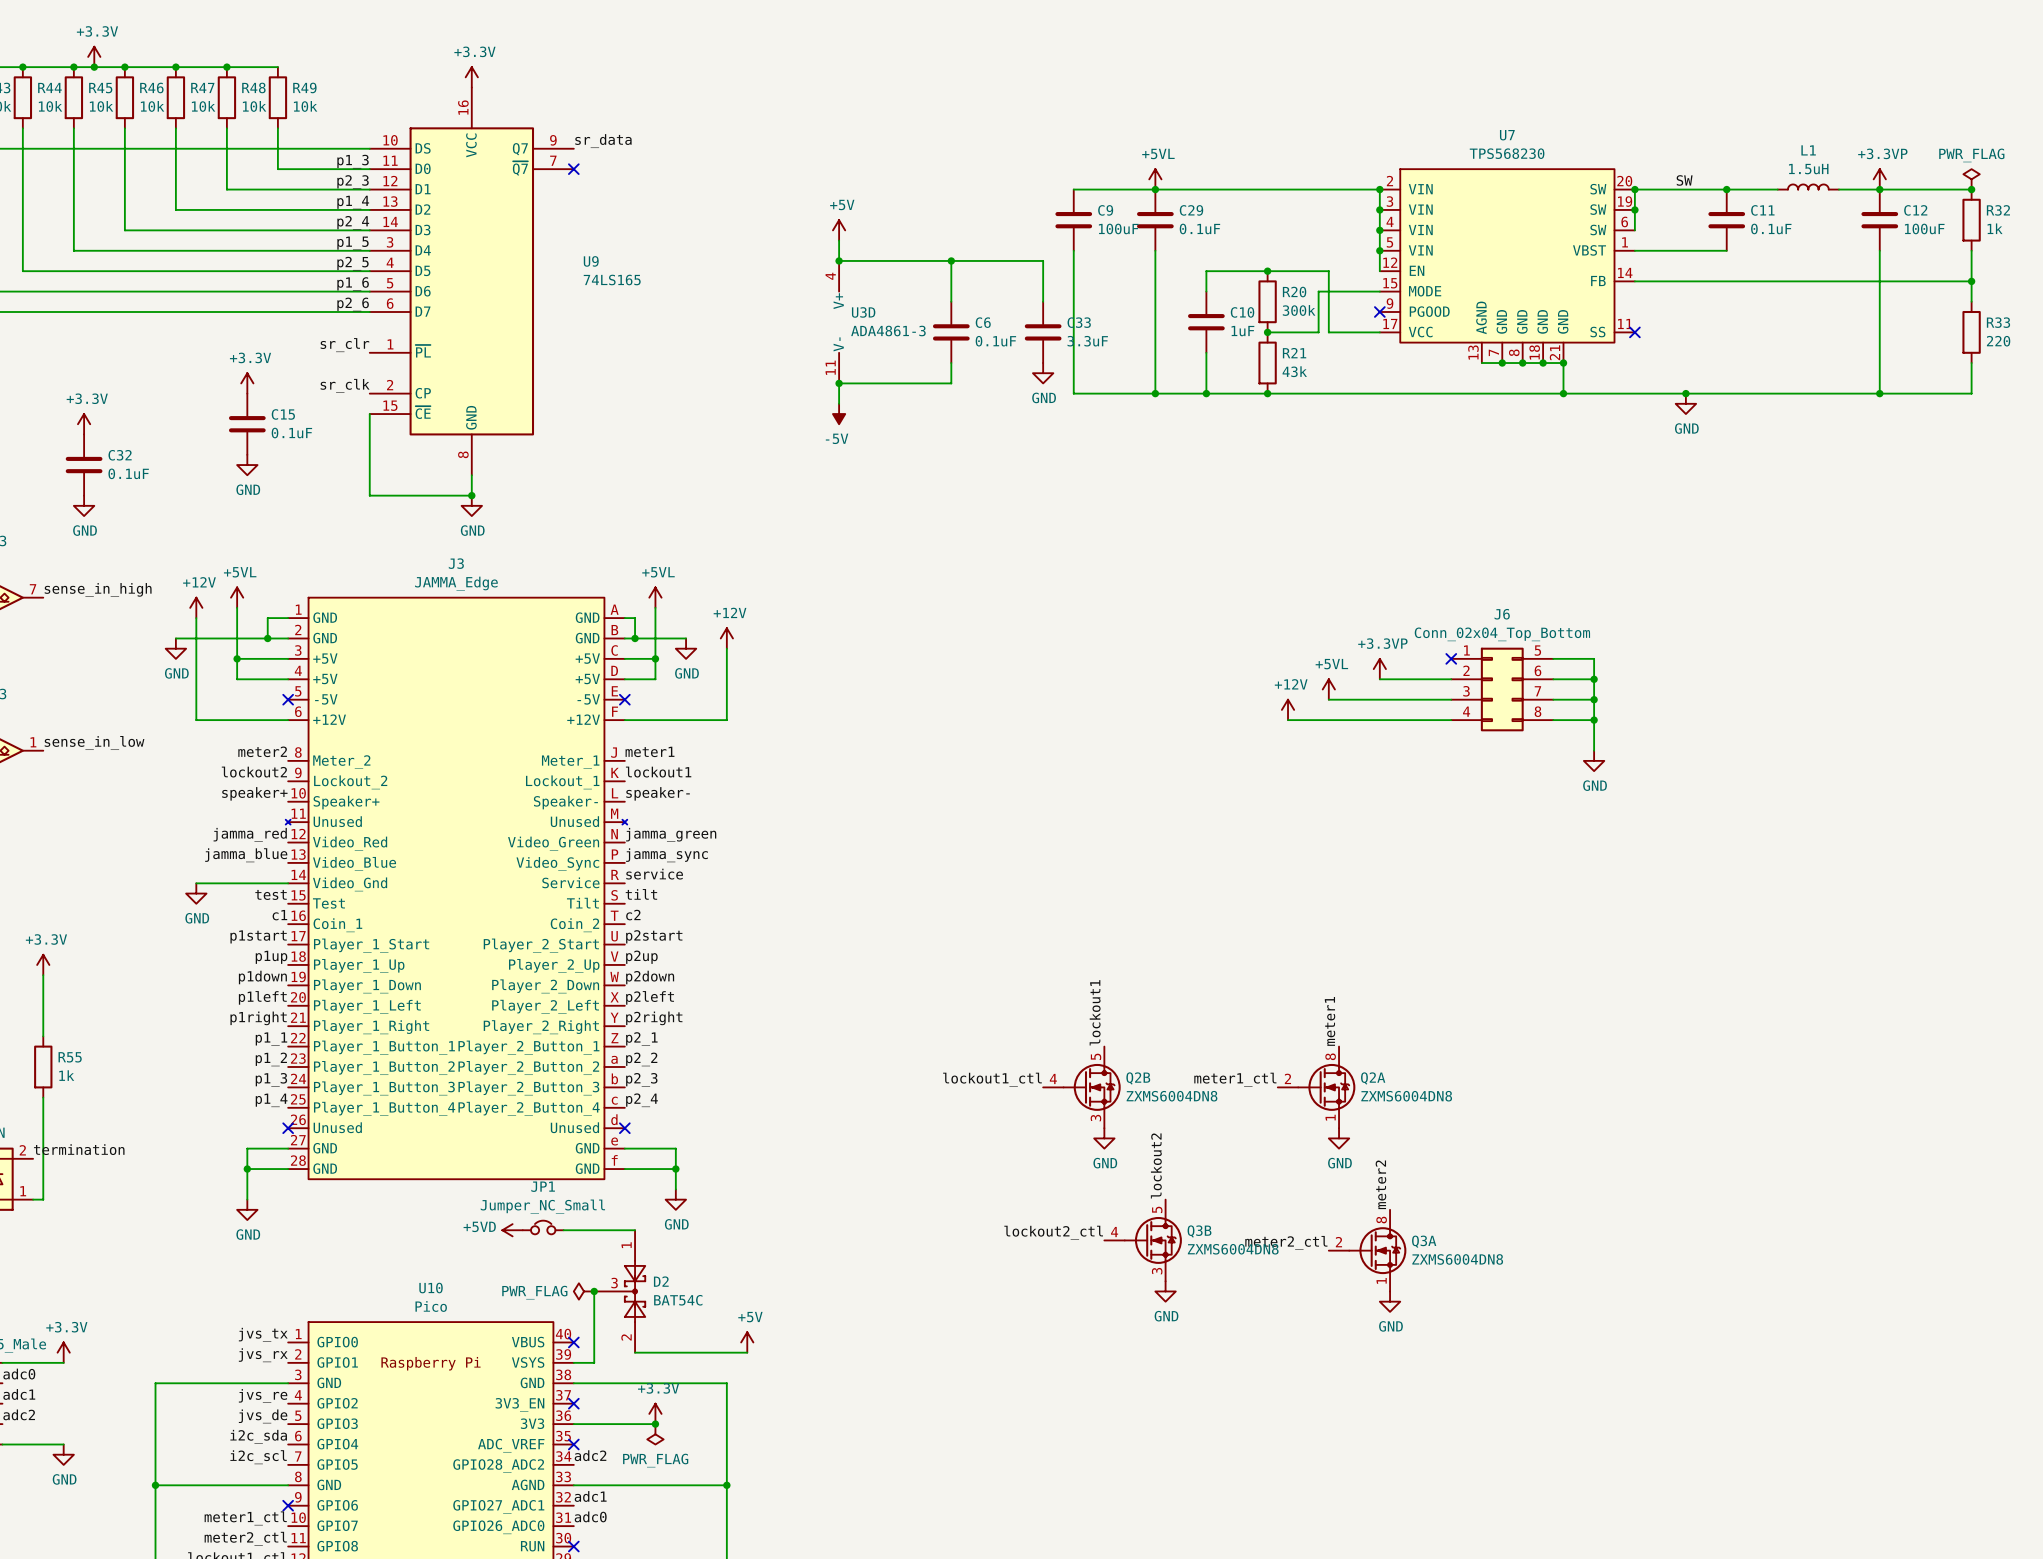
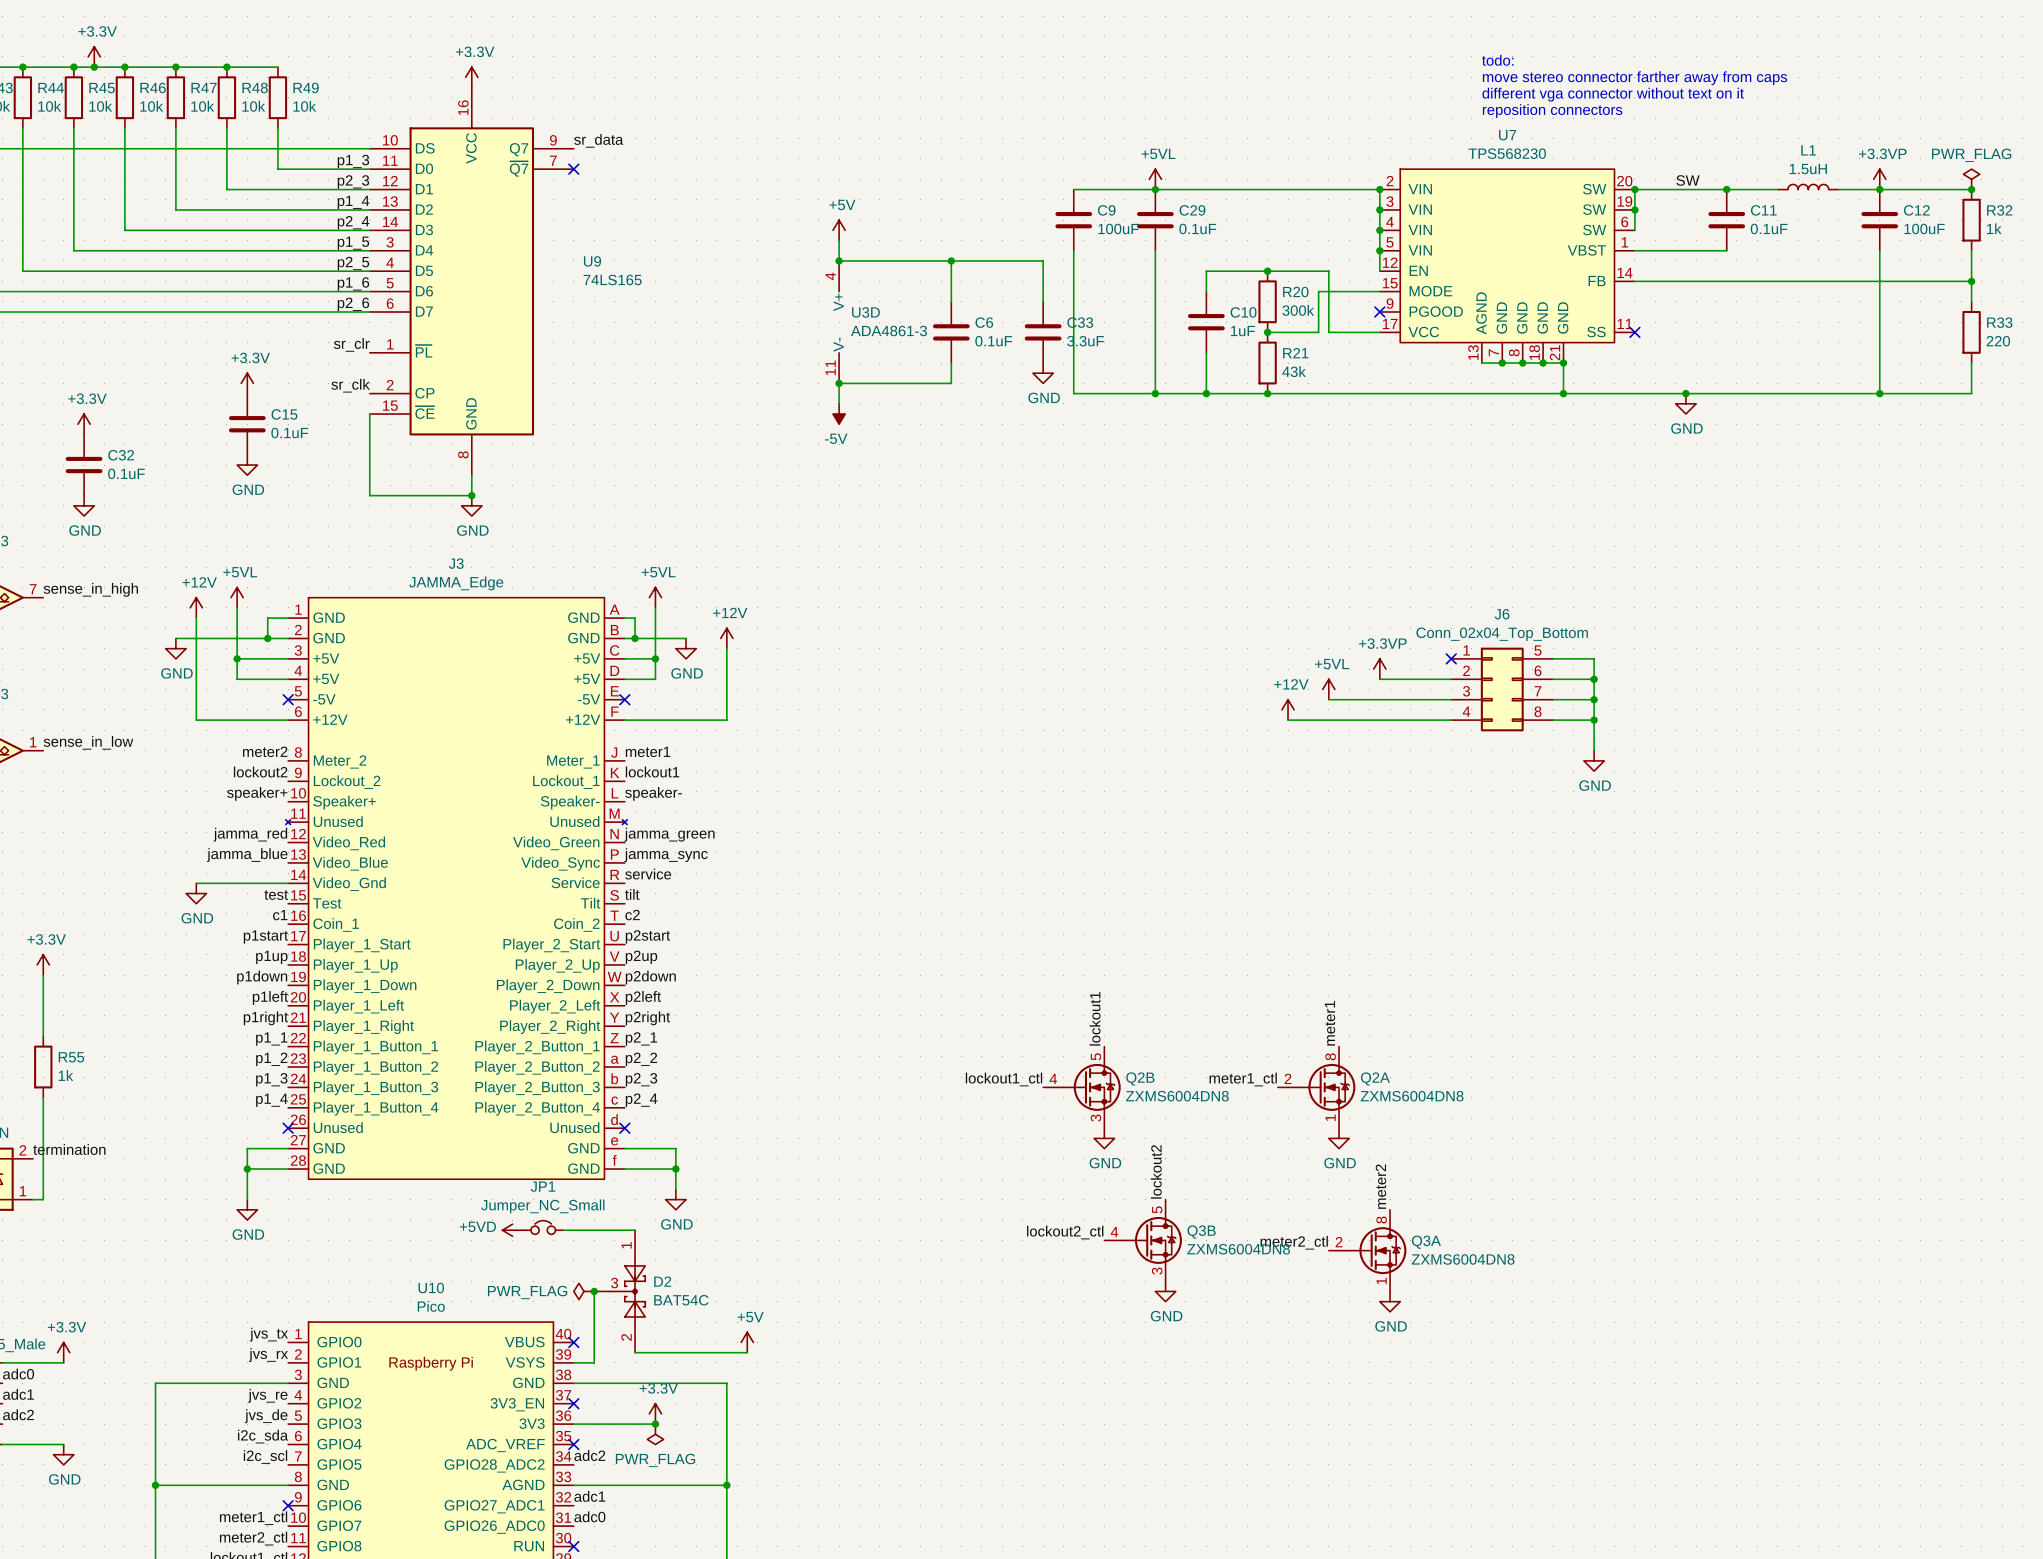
text: none -> todo: (1497, 60)
text: none -> move stereo connector farther away from caps (1634, 78)
text: none -> different vga connector without text on it (1613, 94)
text: none -> reposition connectors (1552, 111)

